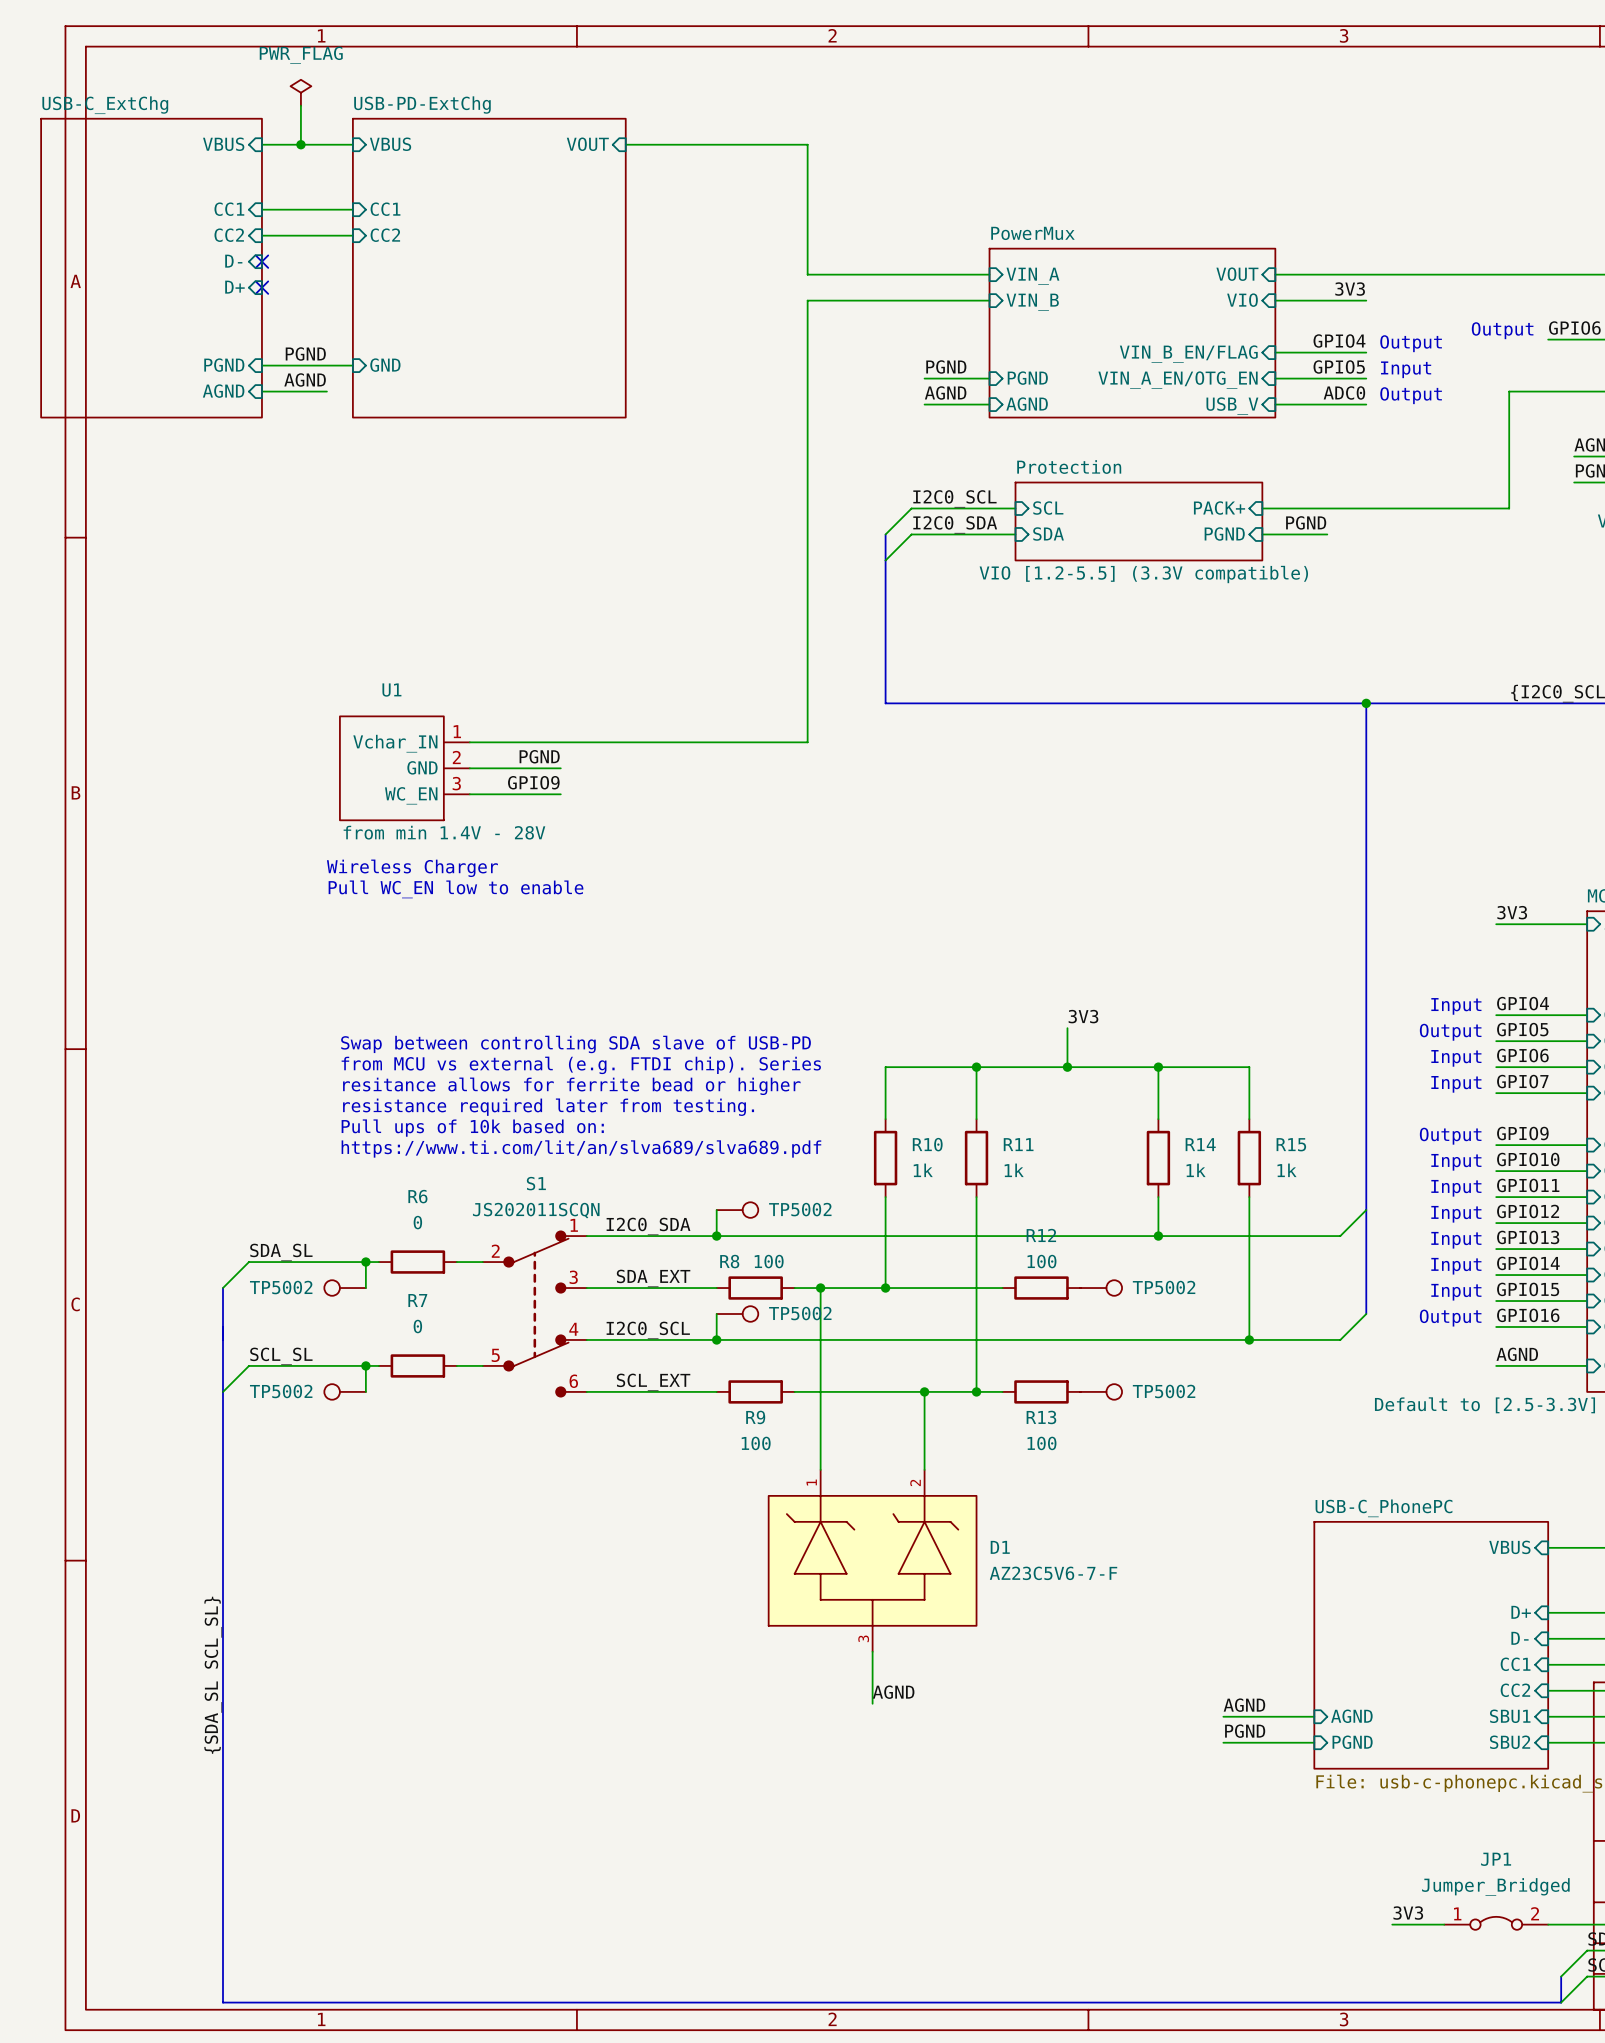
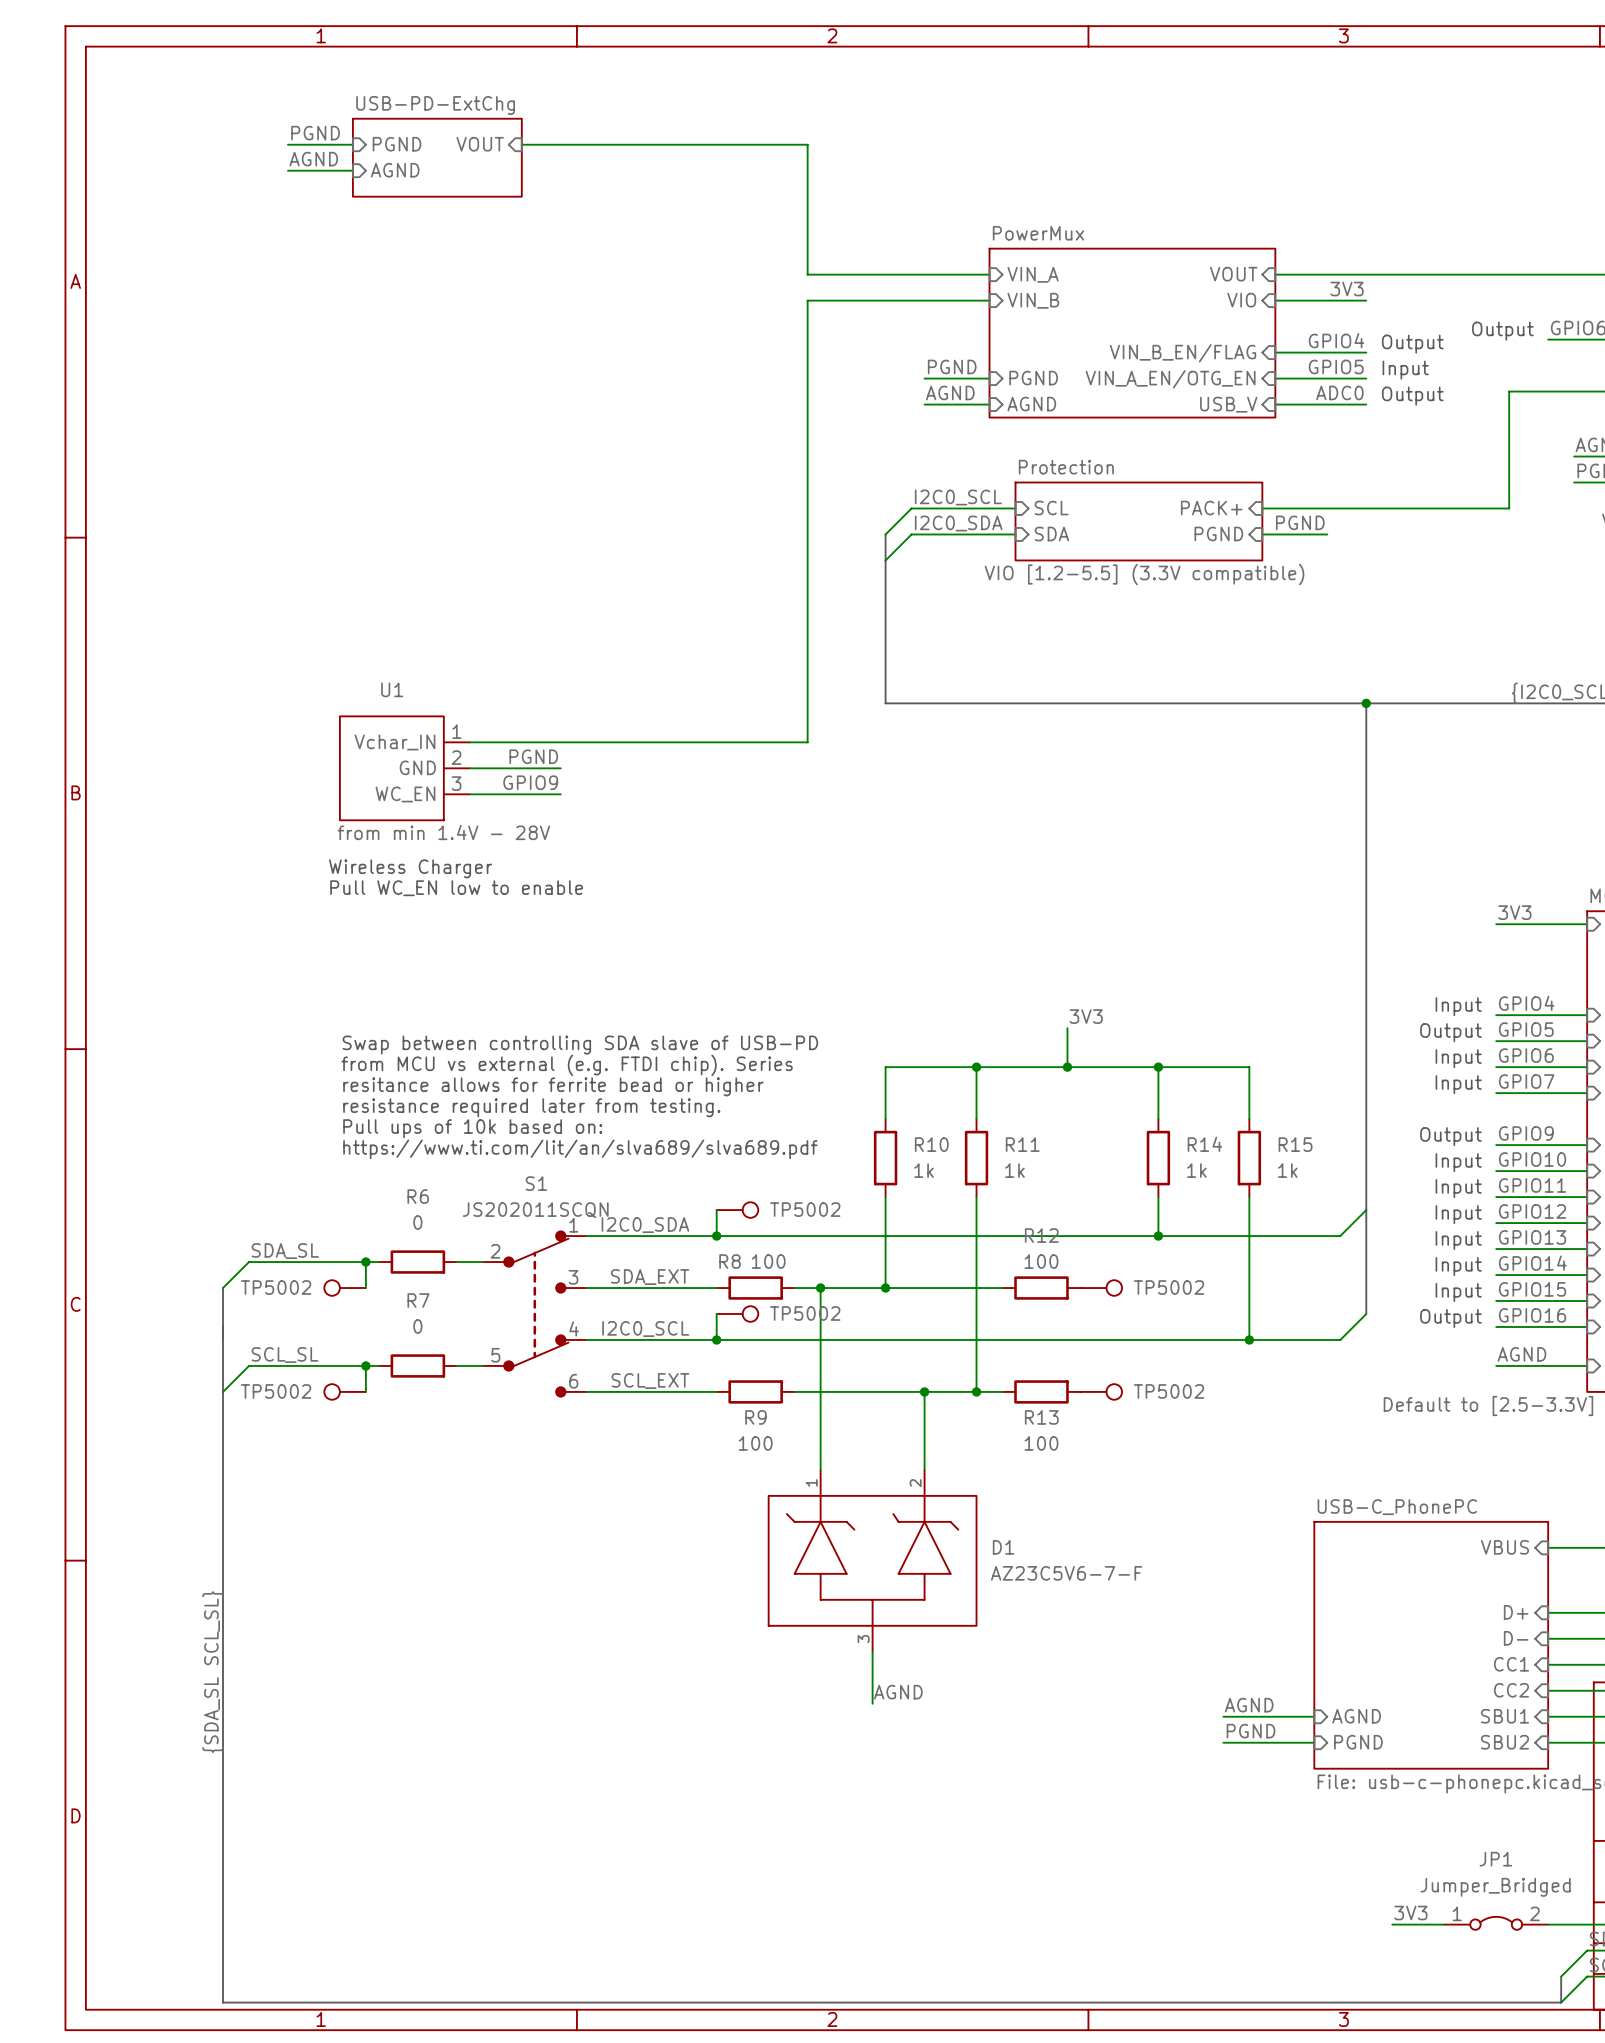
power symbol: PWR_FLAG (300, 92) -> none
wire: (300, 105) (300, 144) -> none
sheet pin: VBUS (223, 144) -> none
wire: (261, 144) (287, 144) -> none
junction: (300, 144) -> none
sheet pin: VBUS (390, 144) -> PGND (397, 144)
wire: none -> (521, 144) (625, 144)
sheet pin position: VOUT (587, 144) -> VOUT (480, 144)
sheet USB-PD-ExtChg: none -> (437, 157)
sheet pin: CC1 (229, 209) -> none
wire: (261, 209) (352, 209) -> none
sheet pin: CC1 (385, 209) -> none
sheet pin: CC2 (229, 235) -> none
wire: (261, 235) (352, 235) -> none
sheet pin: CC2 (385, 235) -> none
sheet pin: D- (233, 261) -> none
no-connect mark: (261, 261) -> none
sheet USB-C_ExtChg: (151, 268) -> none
sheet USB-PD-ExtChg: (489, 268) -> none
sheet pin: D+ (234, 287) -> none
no-connect mark: (261, 287) -> none
label position: PGND (305, 354) -> PGND (315, 133)
sheet pin: PGND (224, 365) -> none
wire: (261, 365) (352, 365) -> none
sheet pin: GND (385, 365) -> none
label position: AGND (305, 379) -> AGND (313, 159)
sheet pin rotation: 0° (223, 391) -> 180° (395, 170)
sheet pin position: AGND (223, 391) -> AGND (395, 170)
wire: (261, 391) (326, 391) -> (287, 170) (352, 170)

